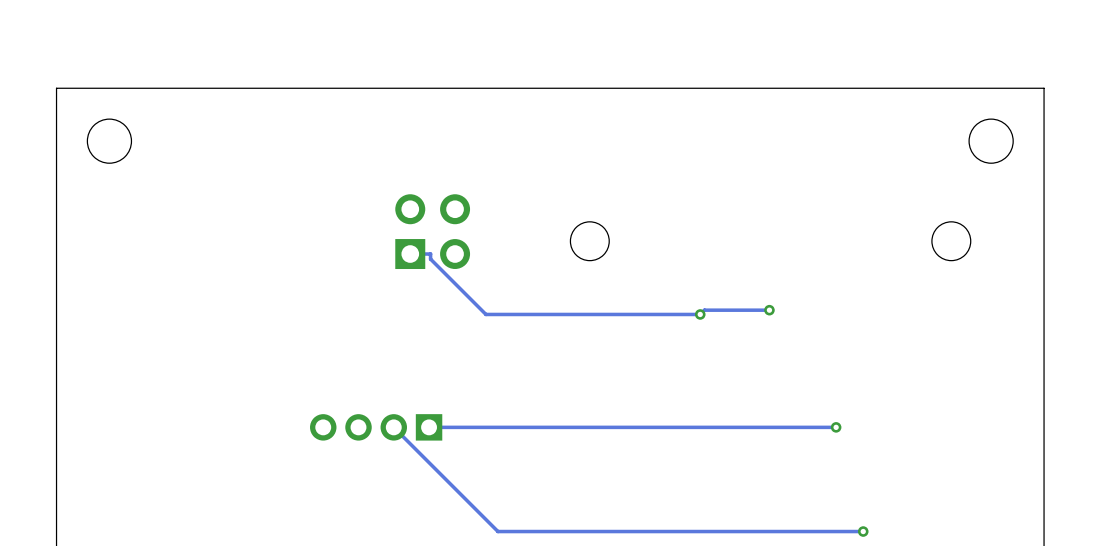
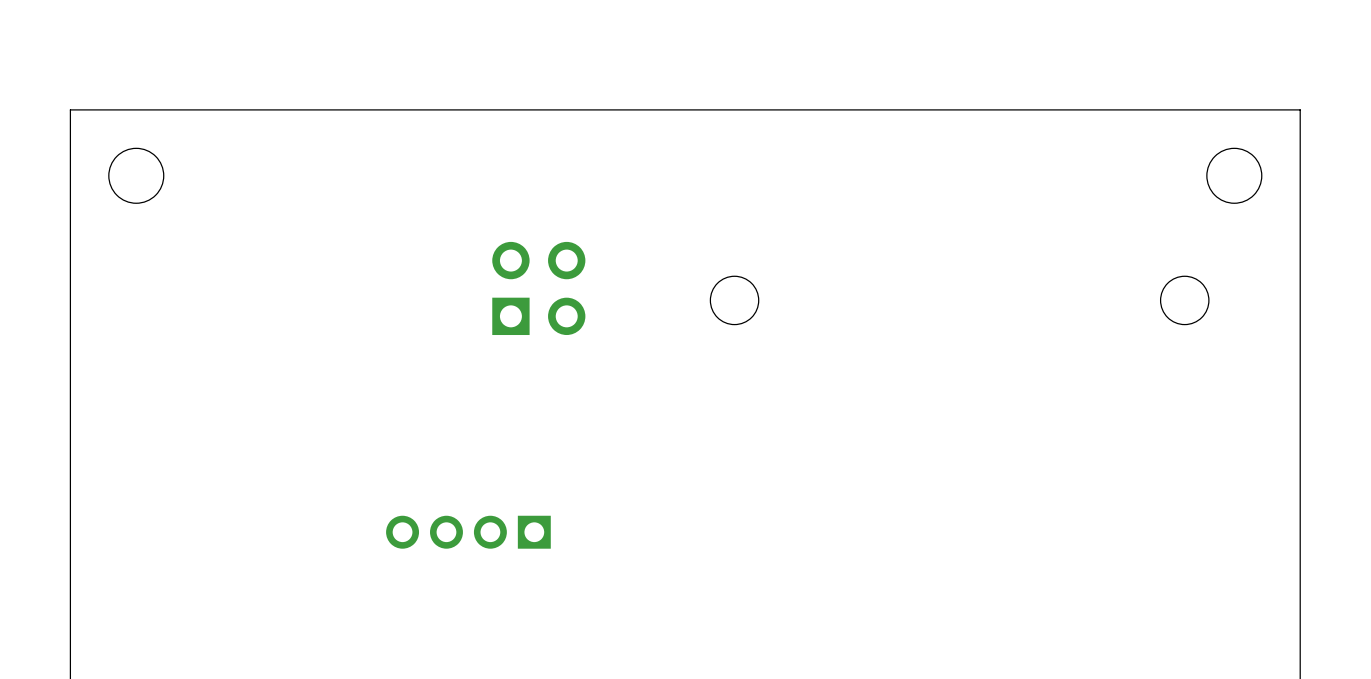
track: (410, 254) (430, 254) (430, 259) (485, 314) (700, 314) (704, 310) (769, 310) -> none
via: (769, 310) -> none
via: (700, 314) -> none
track: (393, 427) (497, 531) (863, 531) -> none
track: (836, 427) (429, 427) -> none
via: (836, 427) -> none
via: (863, 531) -> none

